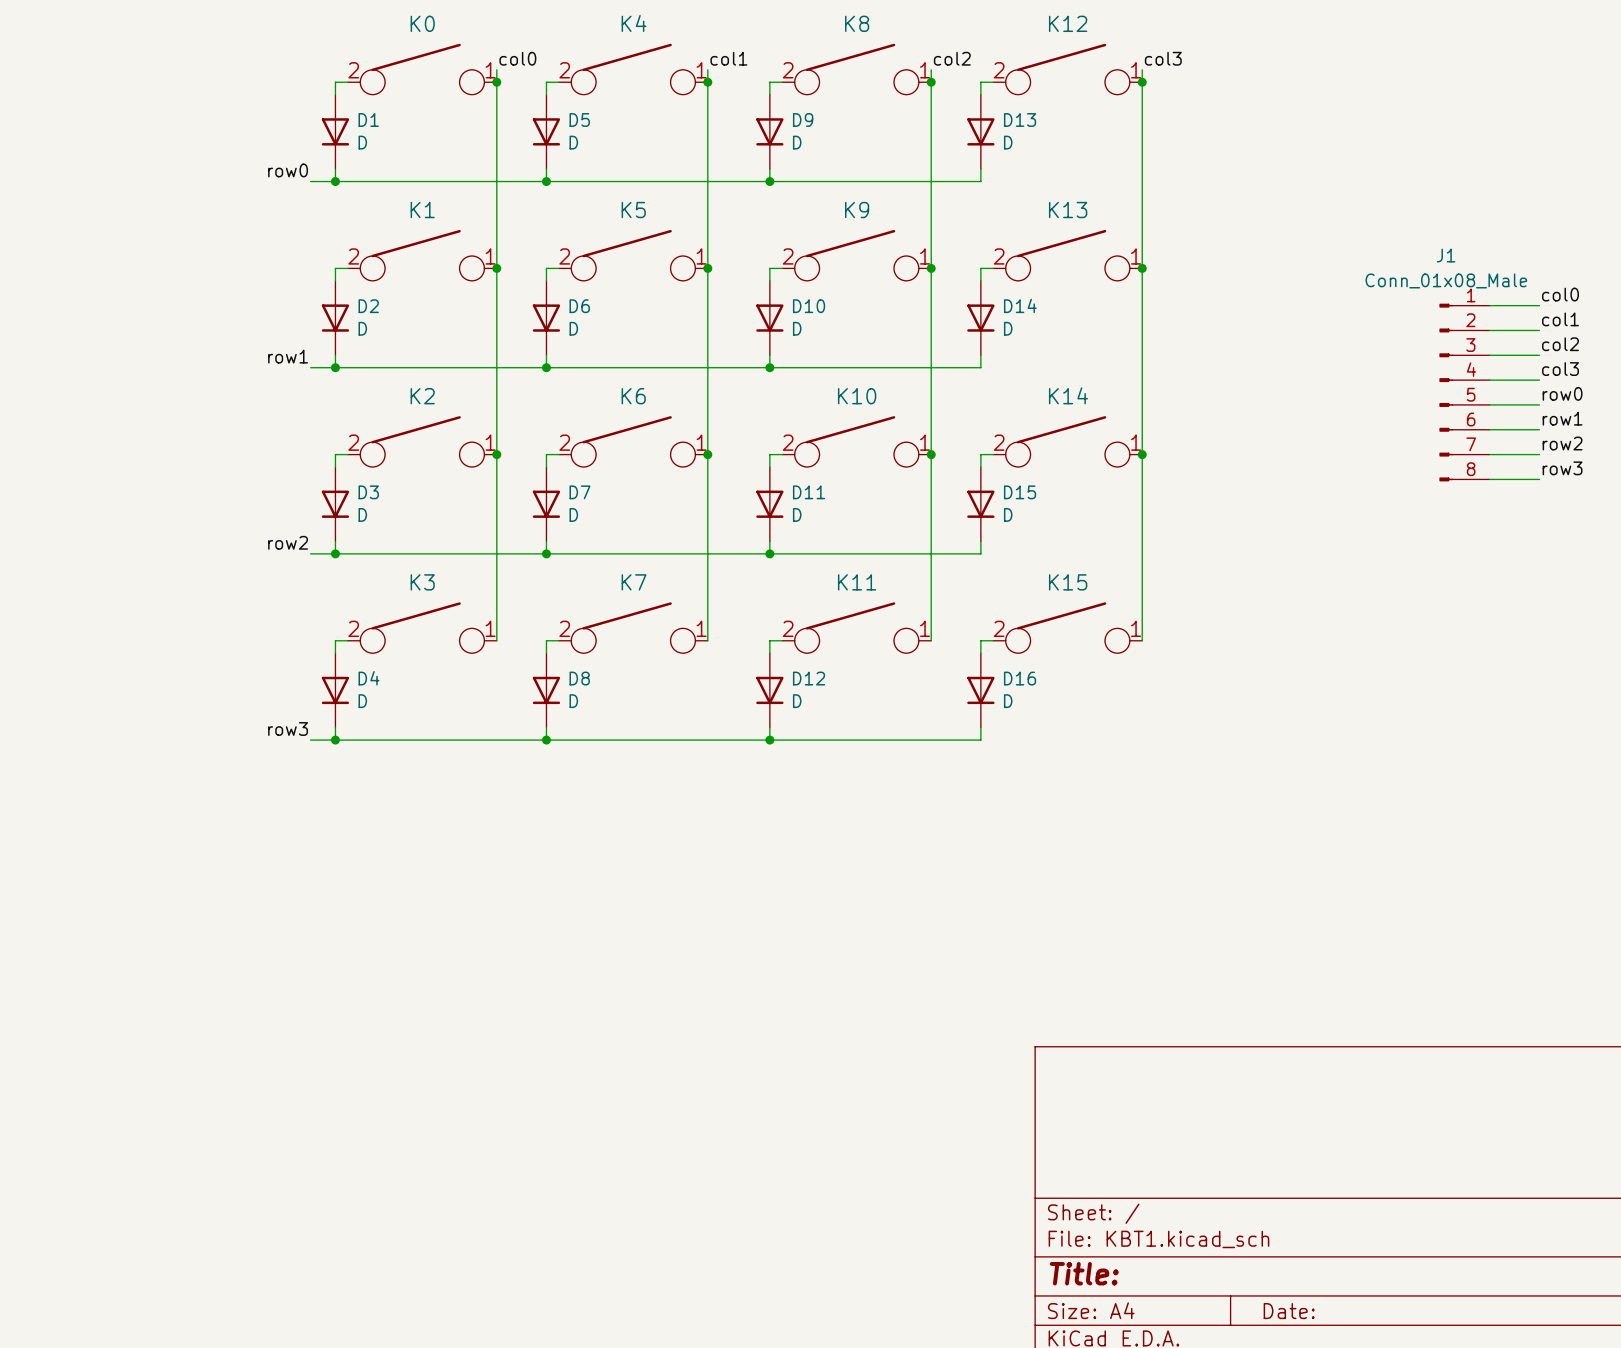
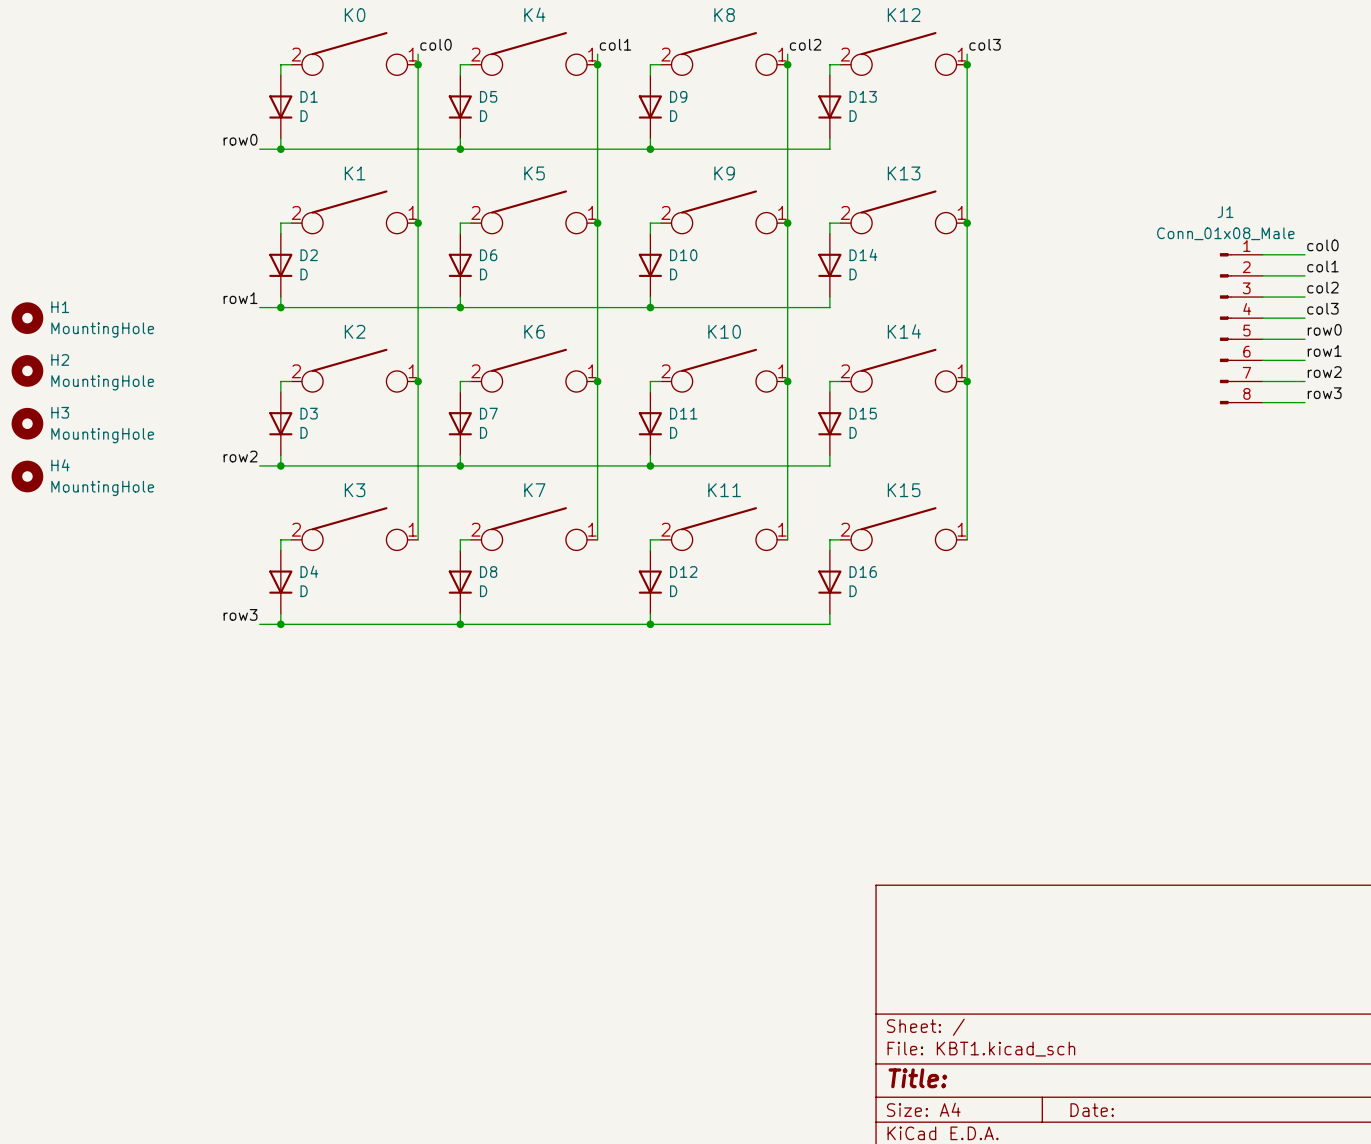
H1: none -> MountingHole (27, 318)
H2: none -> MountingHole (27, 370)
H3: none -> MountingHole (27, 423)
H4: none -> MountingHole (27, 476)

